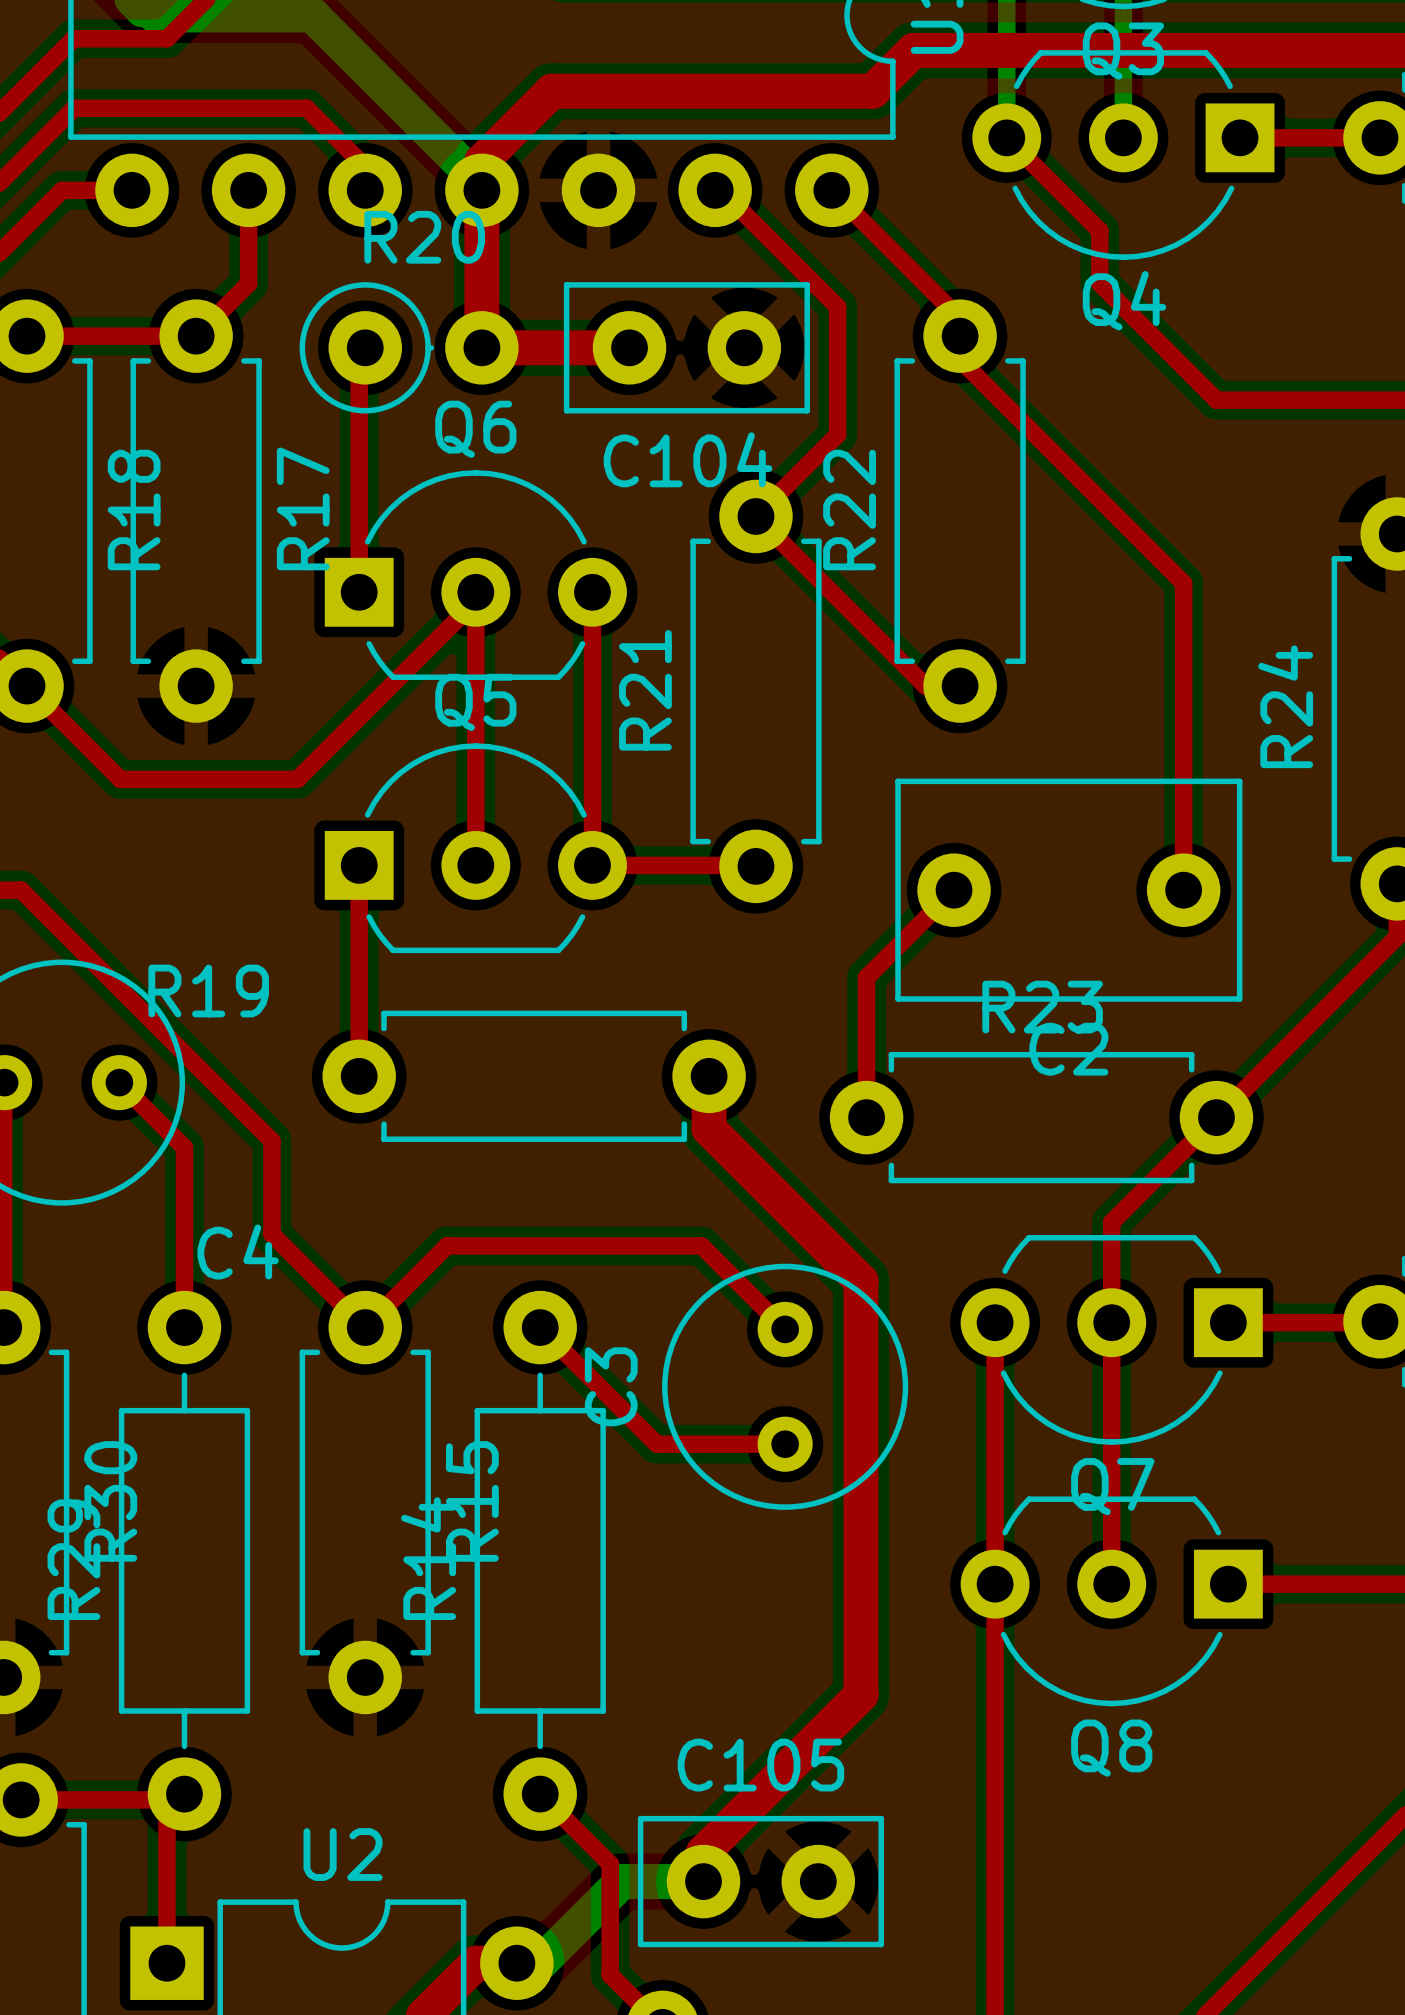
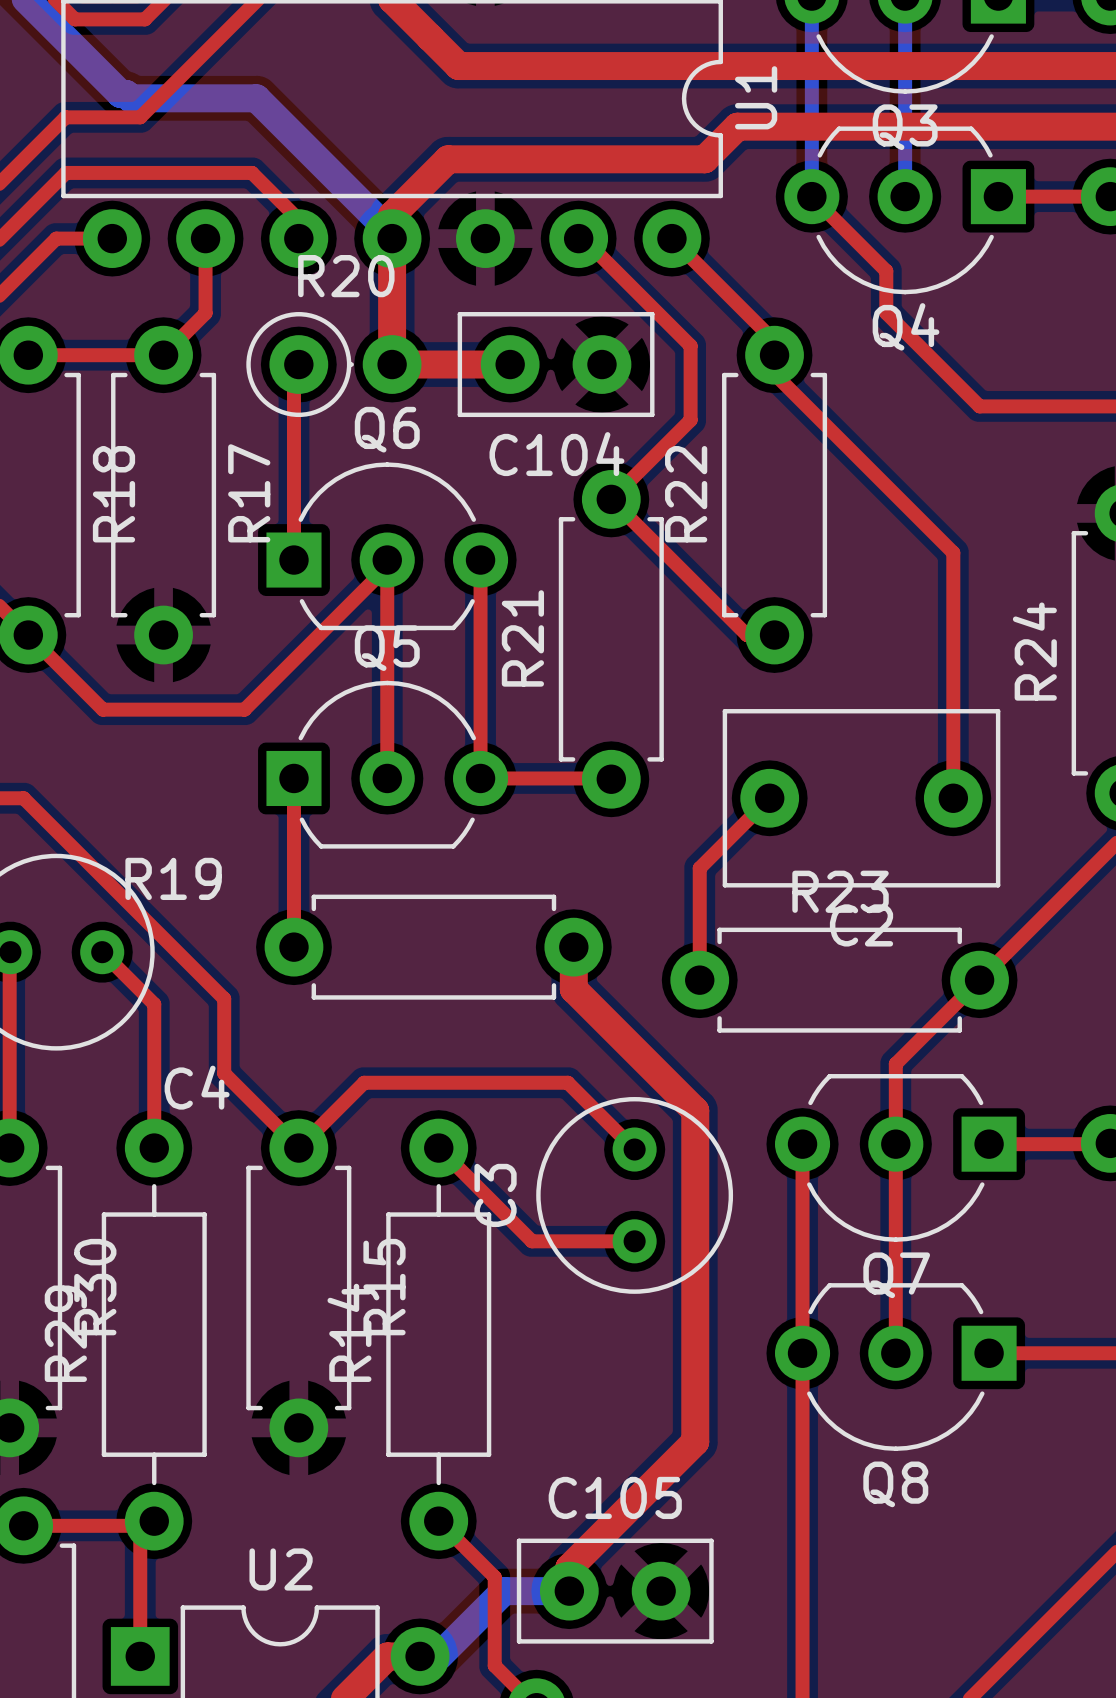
top track: (837, 306) (837, 434) -> (676, 331) (690, 345) (690, 420) (676, 434)

